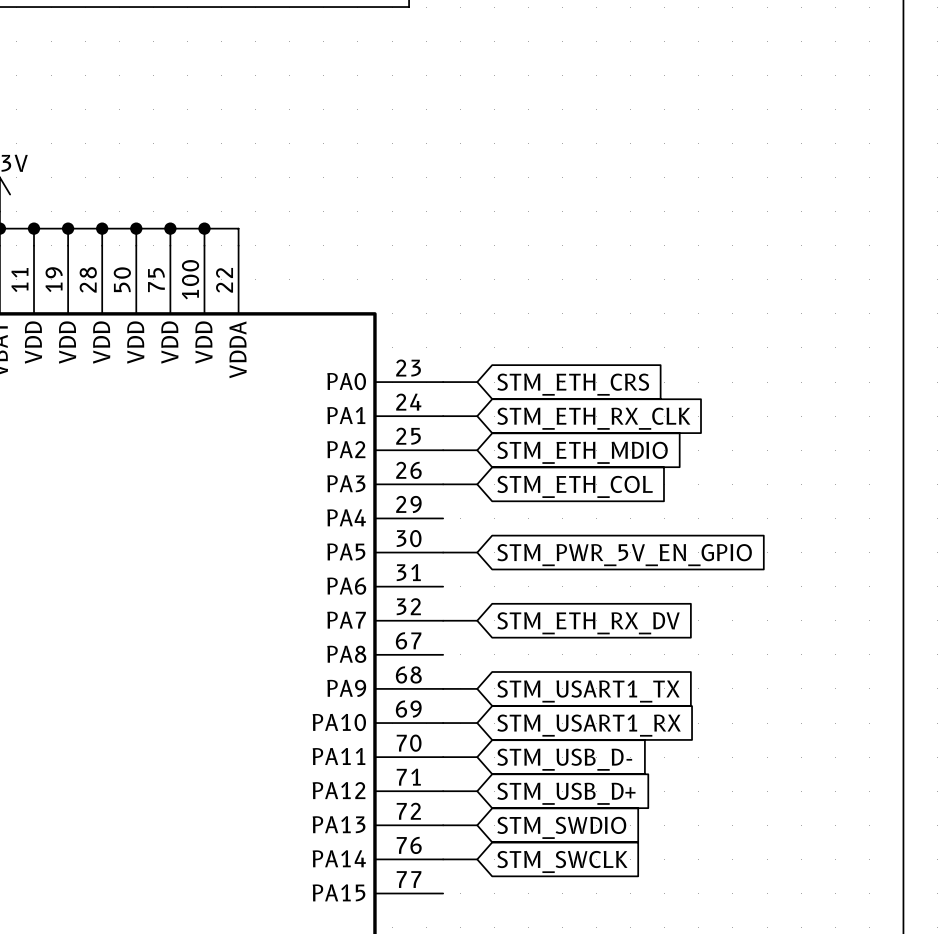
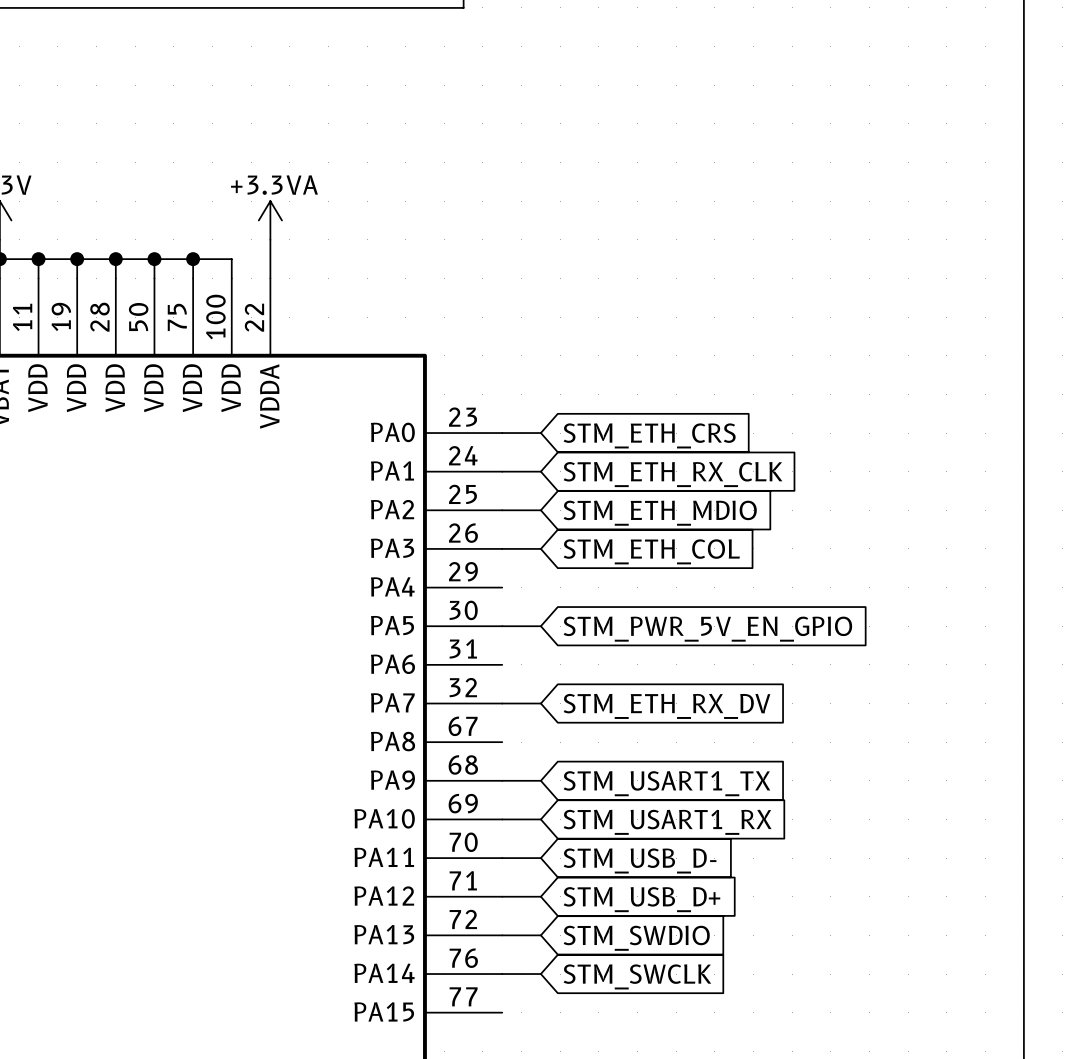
power symbol: none -> +3.3VA (270, 220)
wire: (204, 228) (238, 228) -> (270, 239) (270, 259)
junction: (204, 228) -> none

